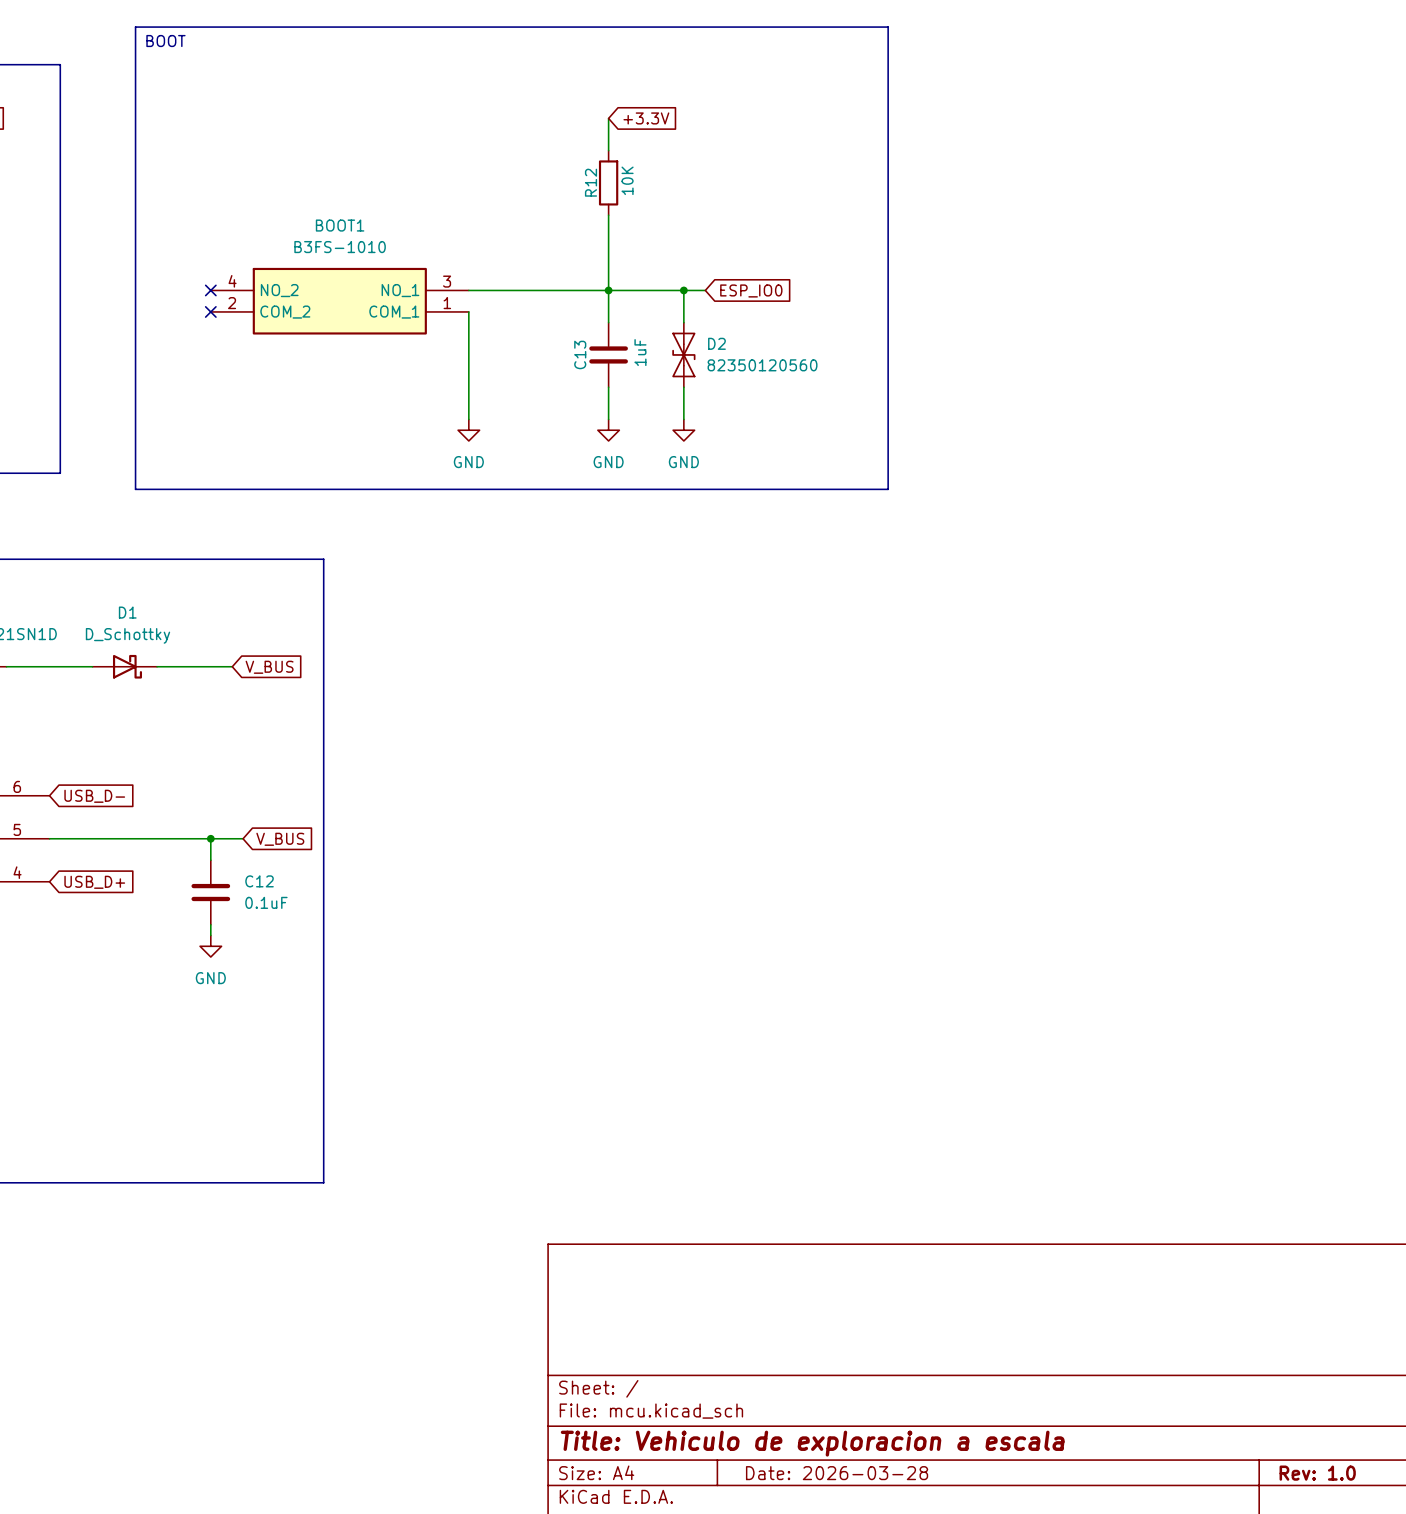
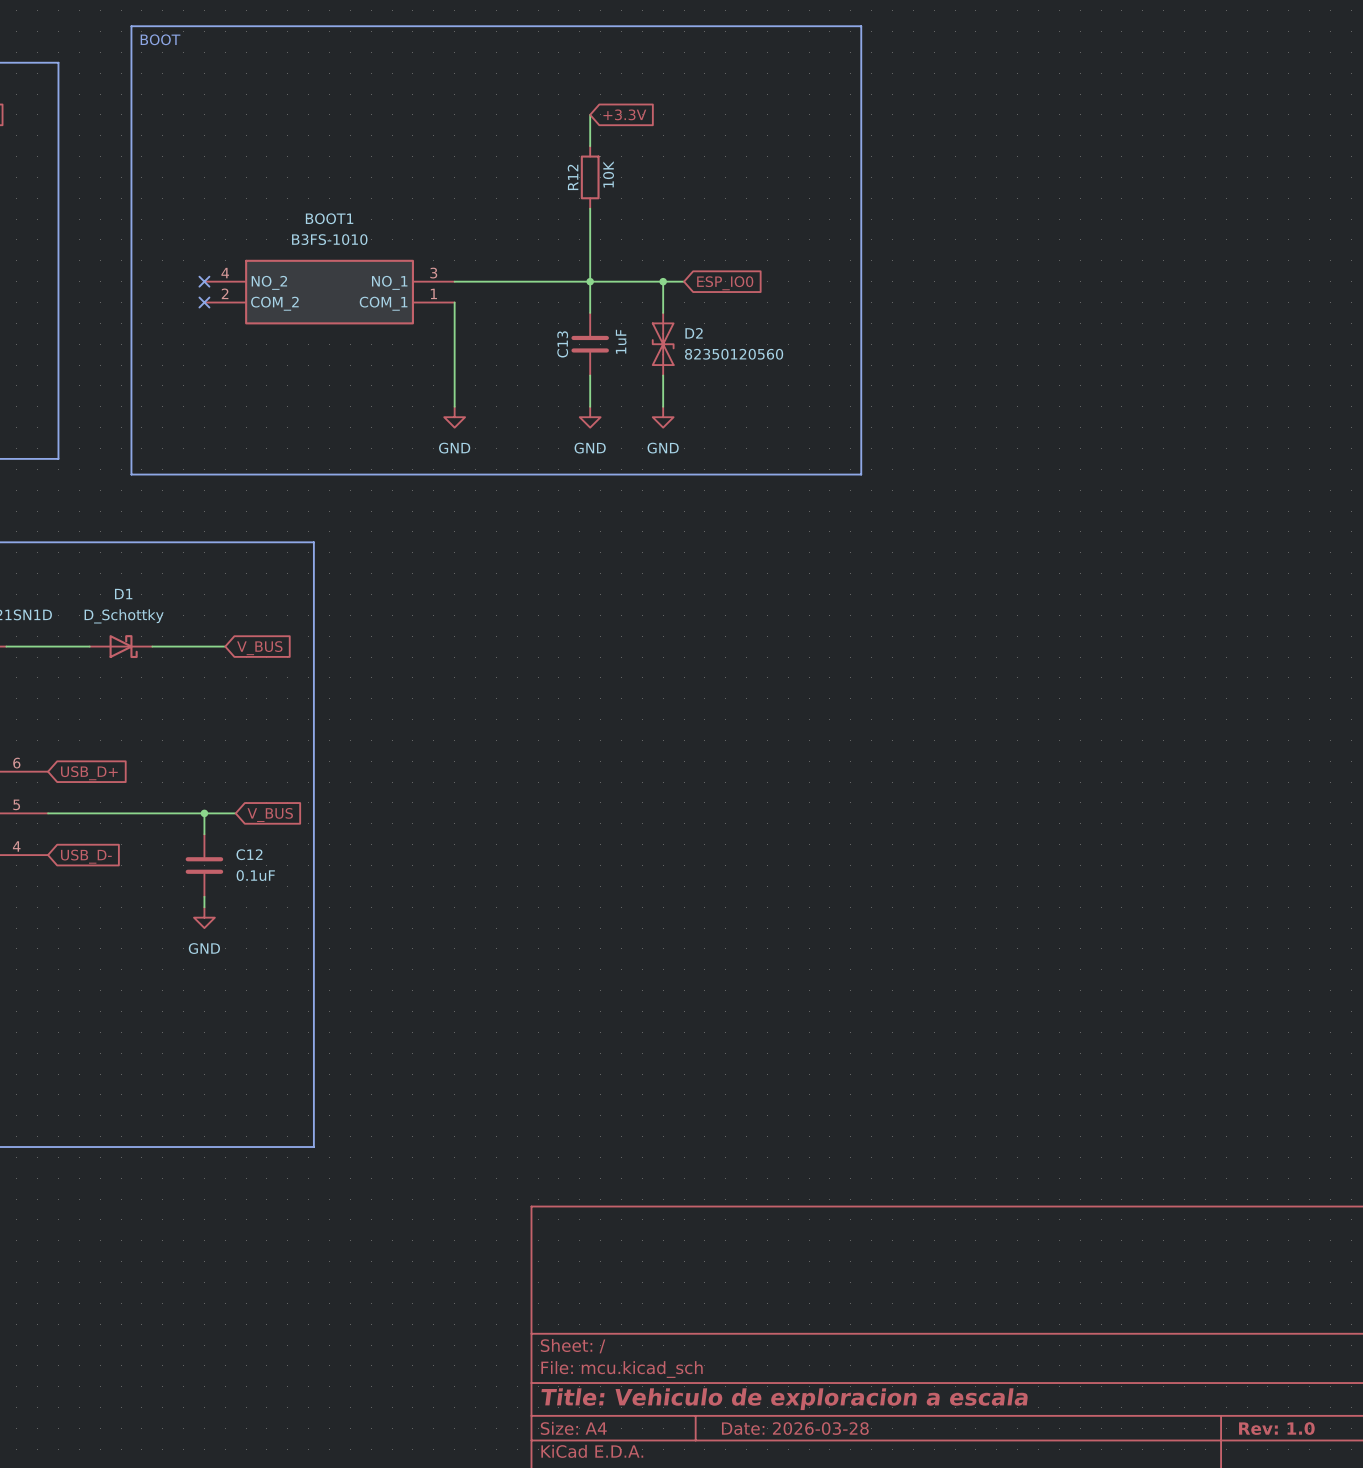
global label: USB_D- (94, 796) -> USB_D+ (89, 773)
global label: USB_D+ (94, 882) -> USB_D- (86, 856)

